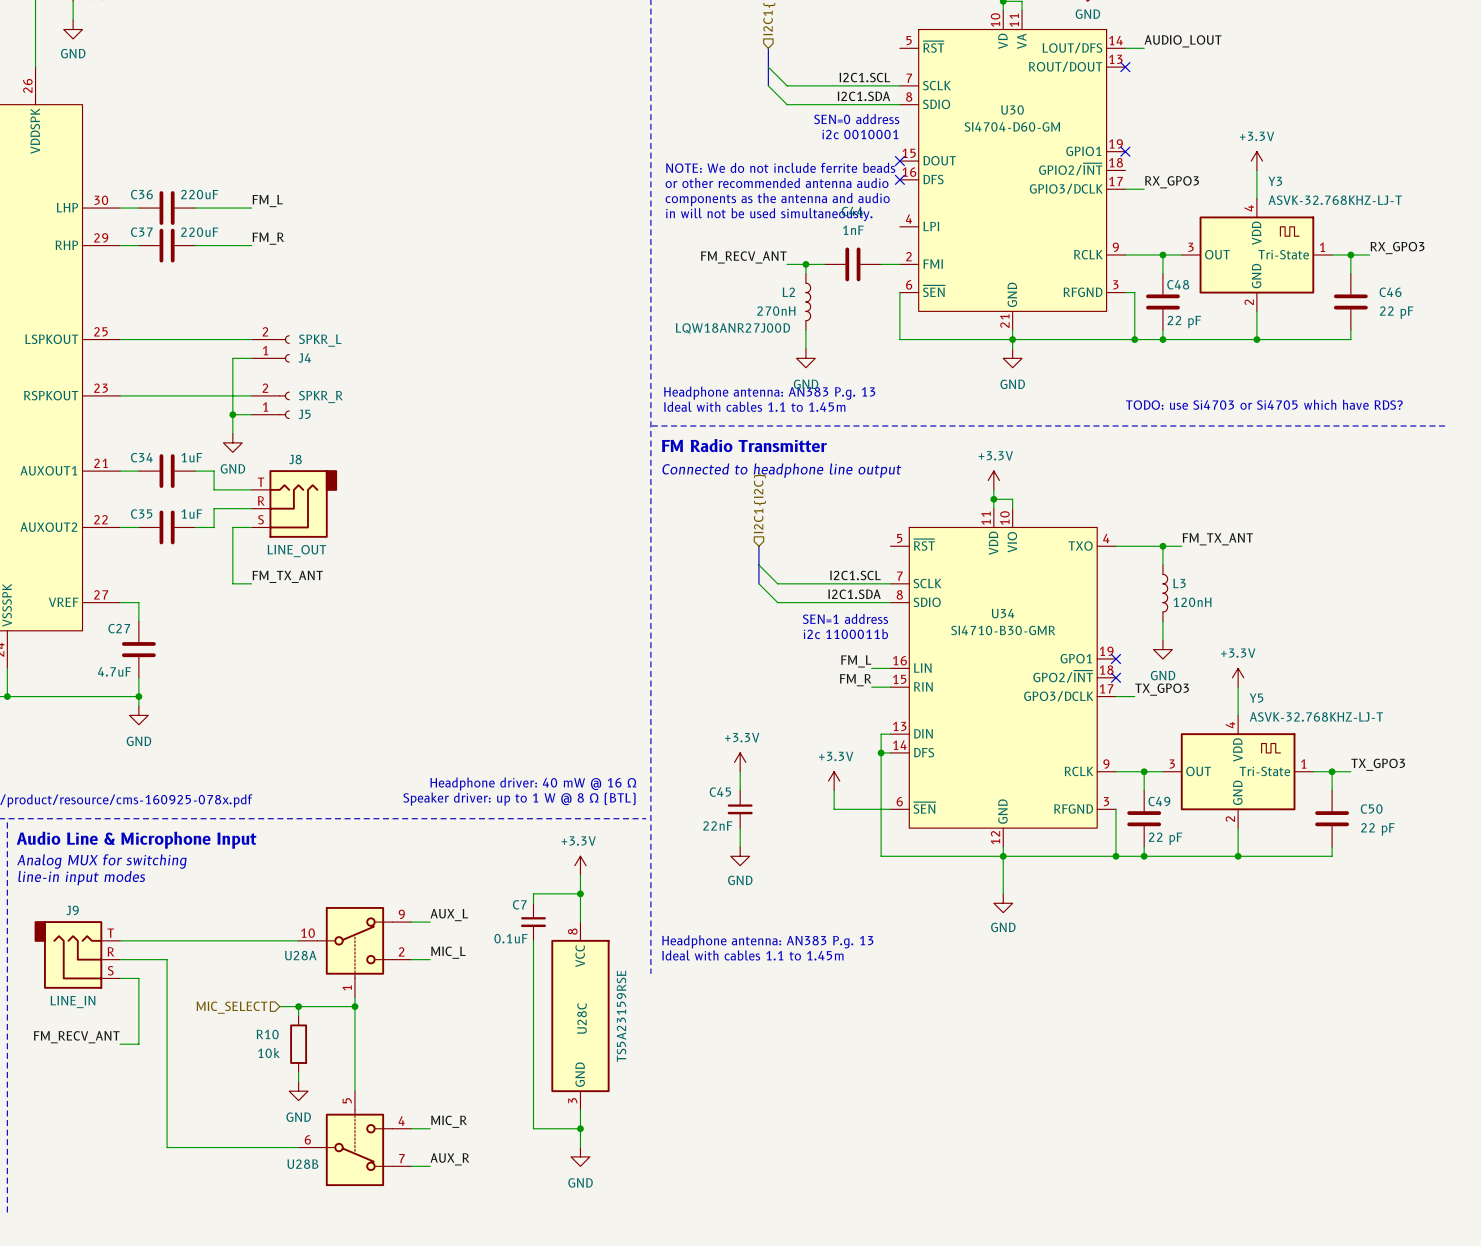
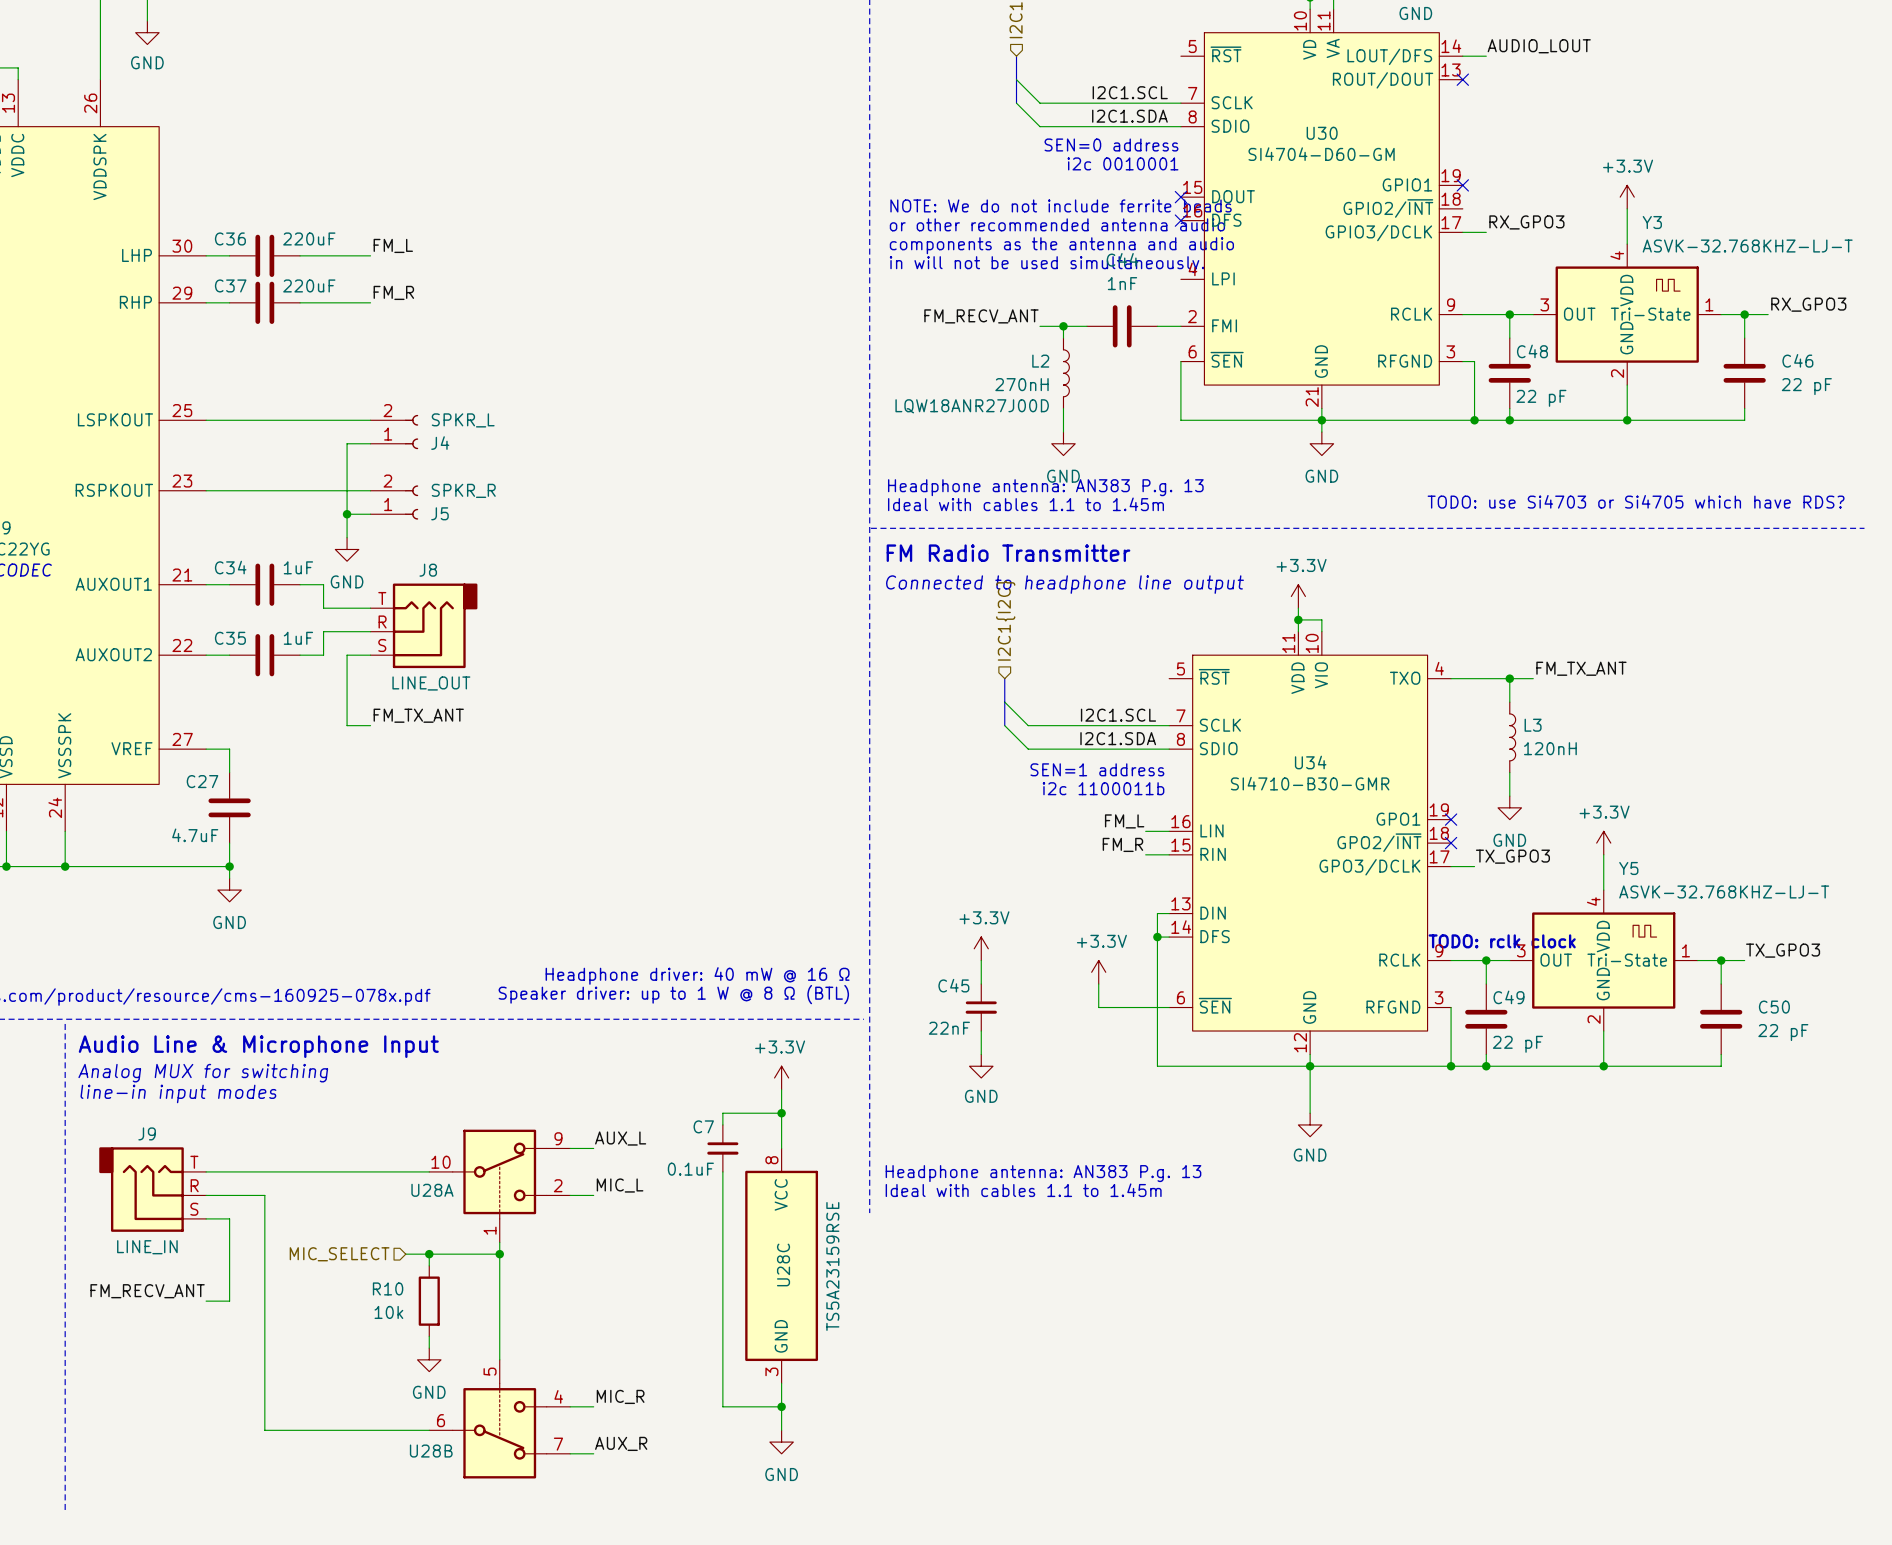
text: none -> TODO: rclk clock (1502, 941)

